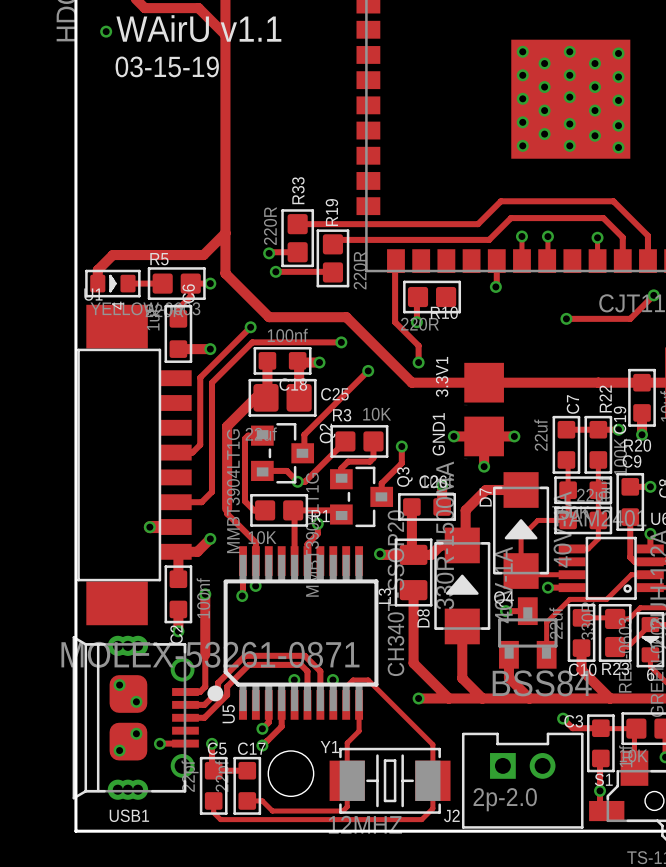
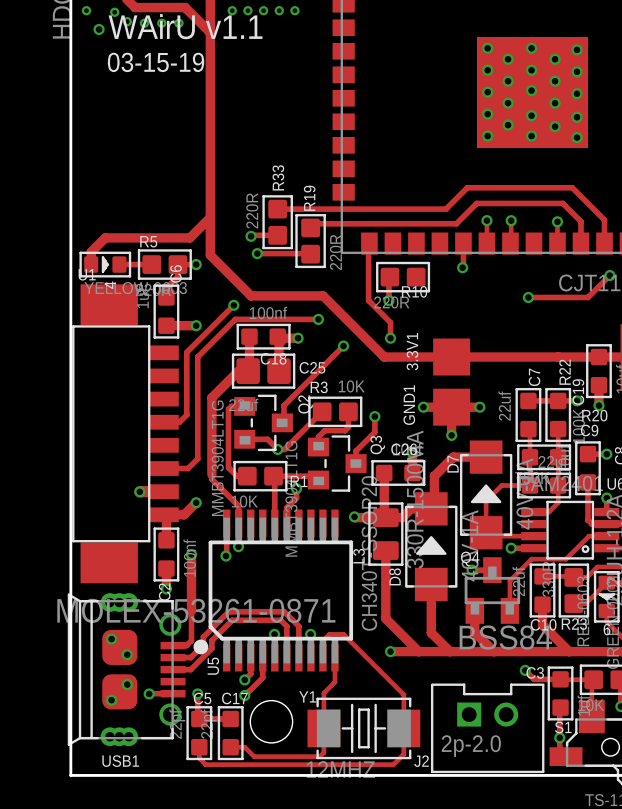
via: none -> (86, 10)
via: none -> (232, 10)
via: none -> (247, 10)
via: none -> (263, 10)
via: none -> (279, 10)
via: none -> (294, 10)
via: none -> (114, 12)
via: none -> (127, 21)
via: none -> (144, 23)
via: none -> (161, 23)
via: none -> (178, 23)

